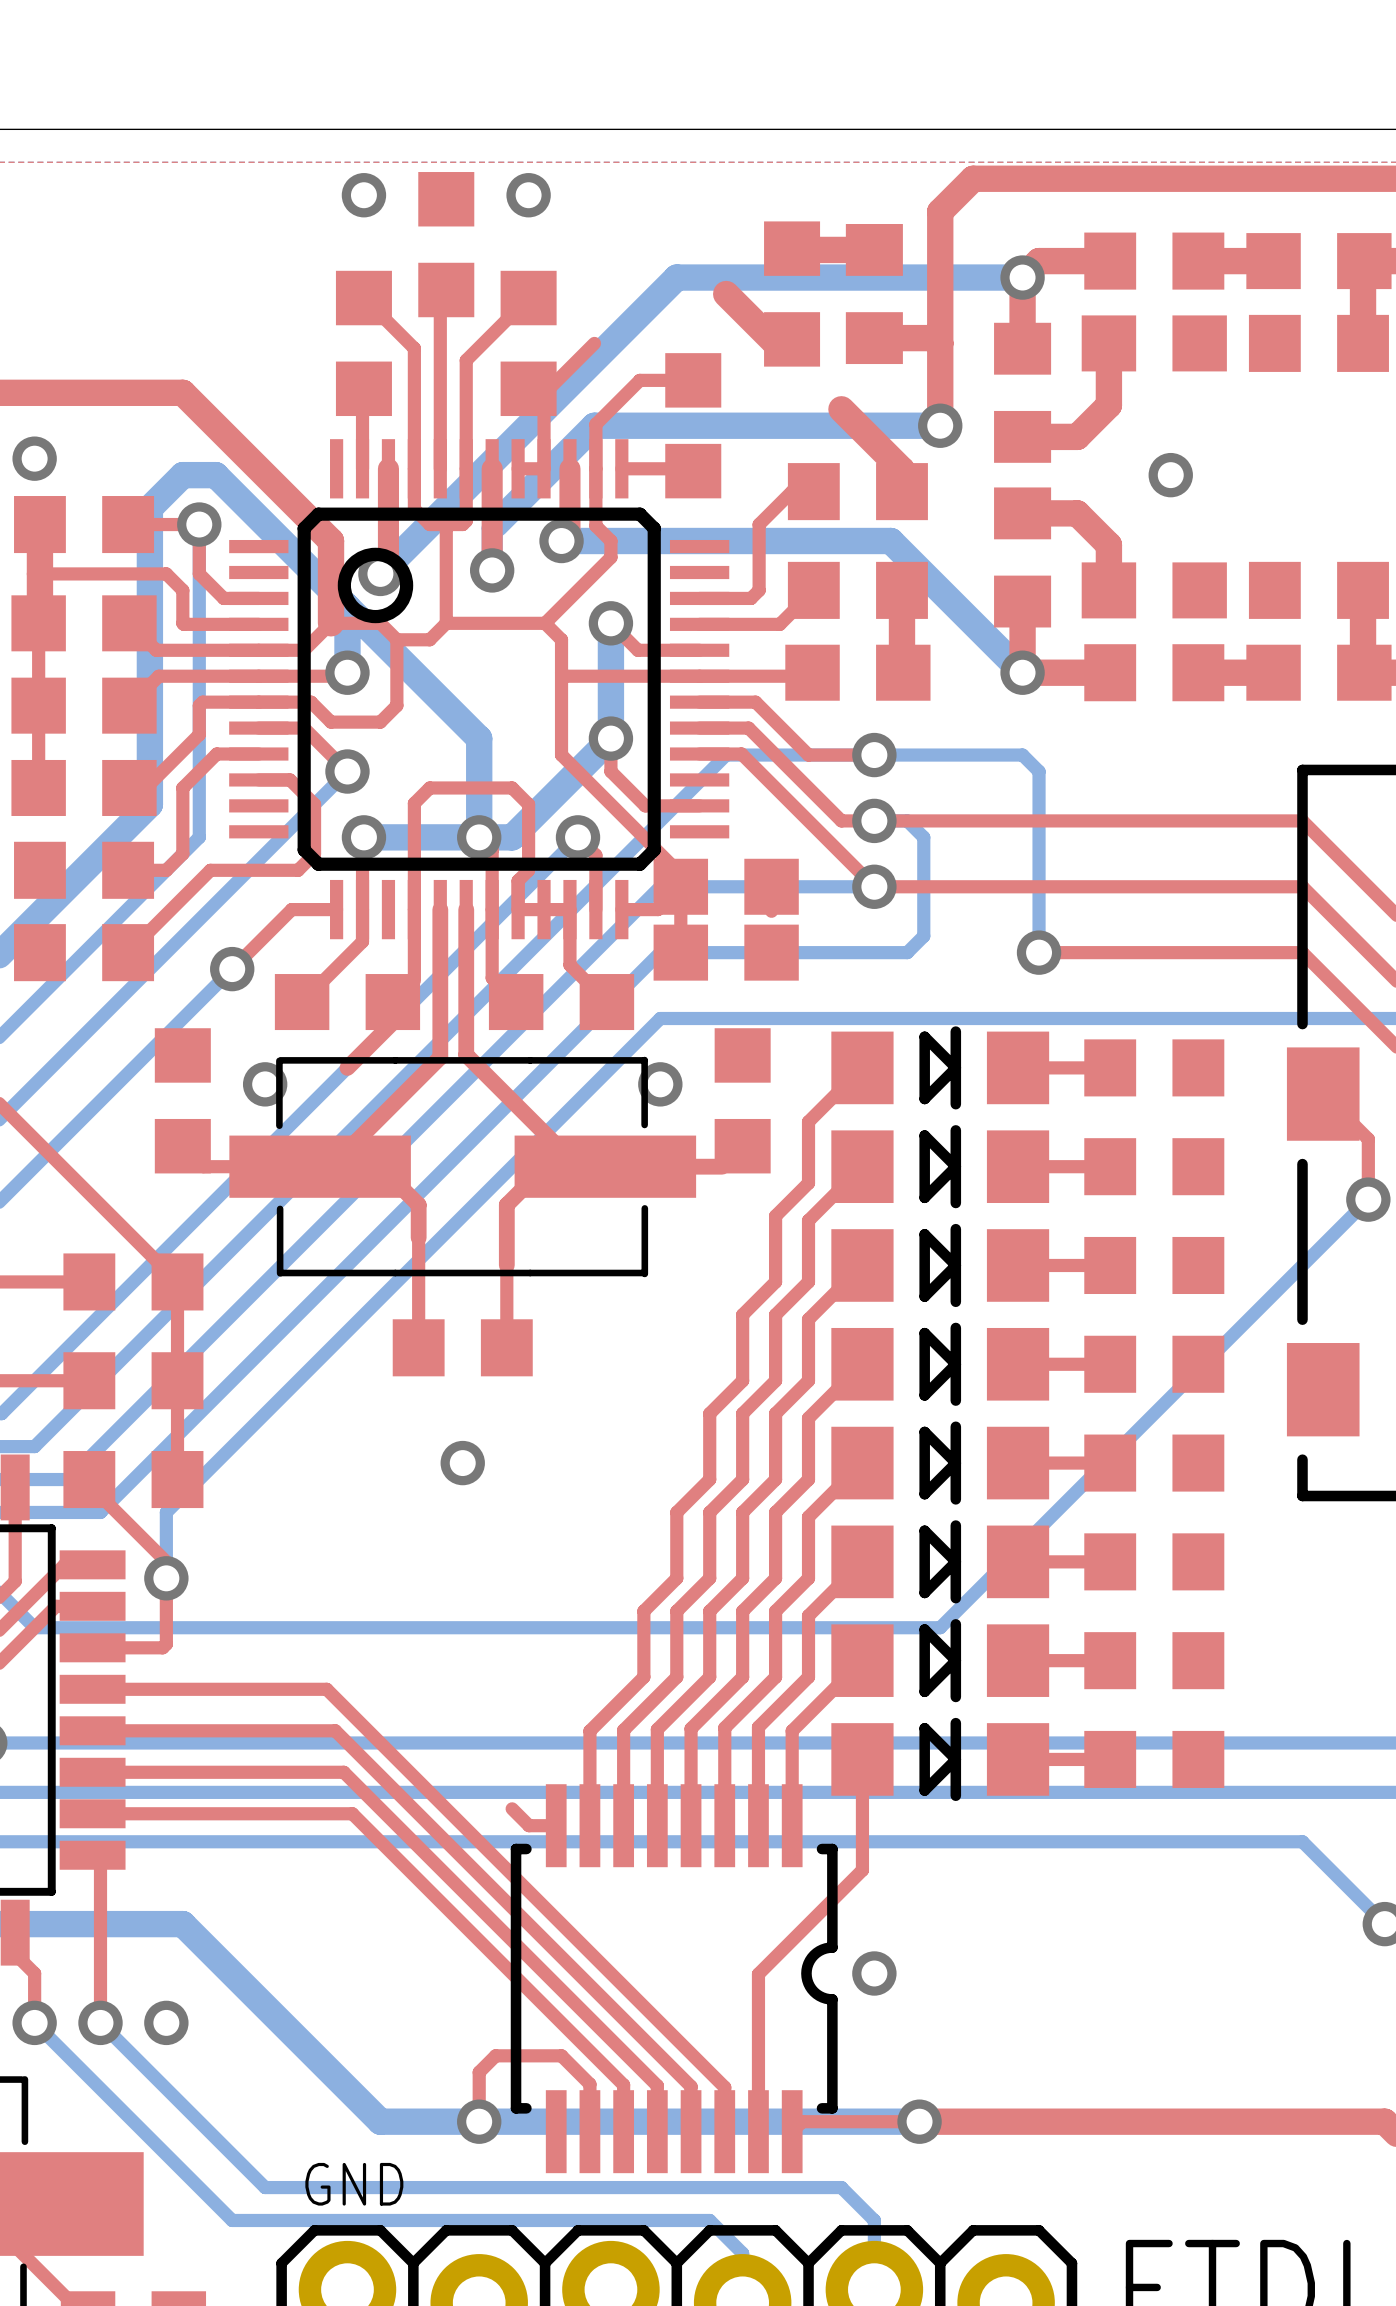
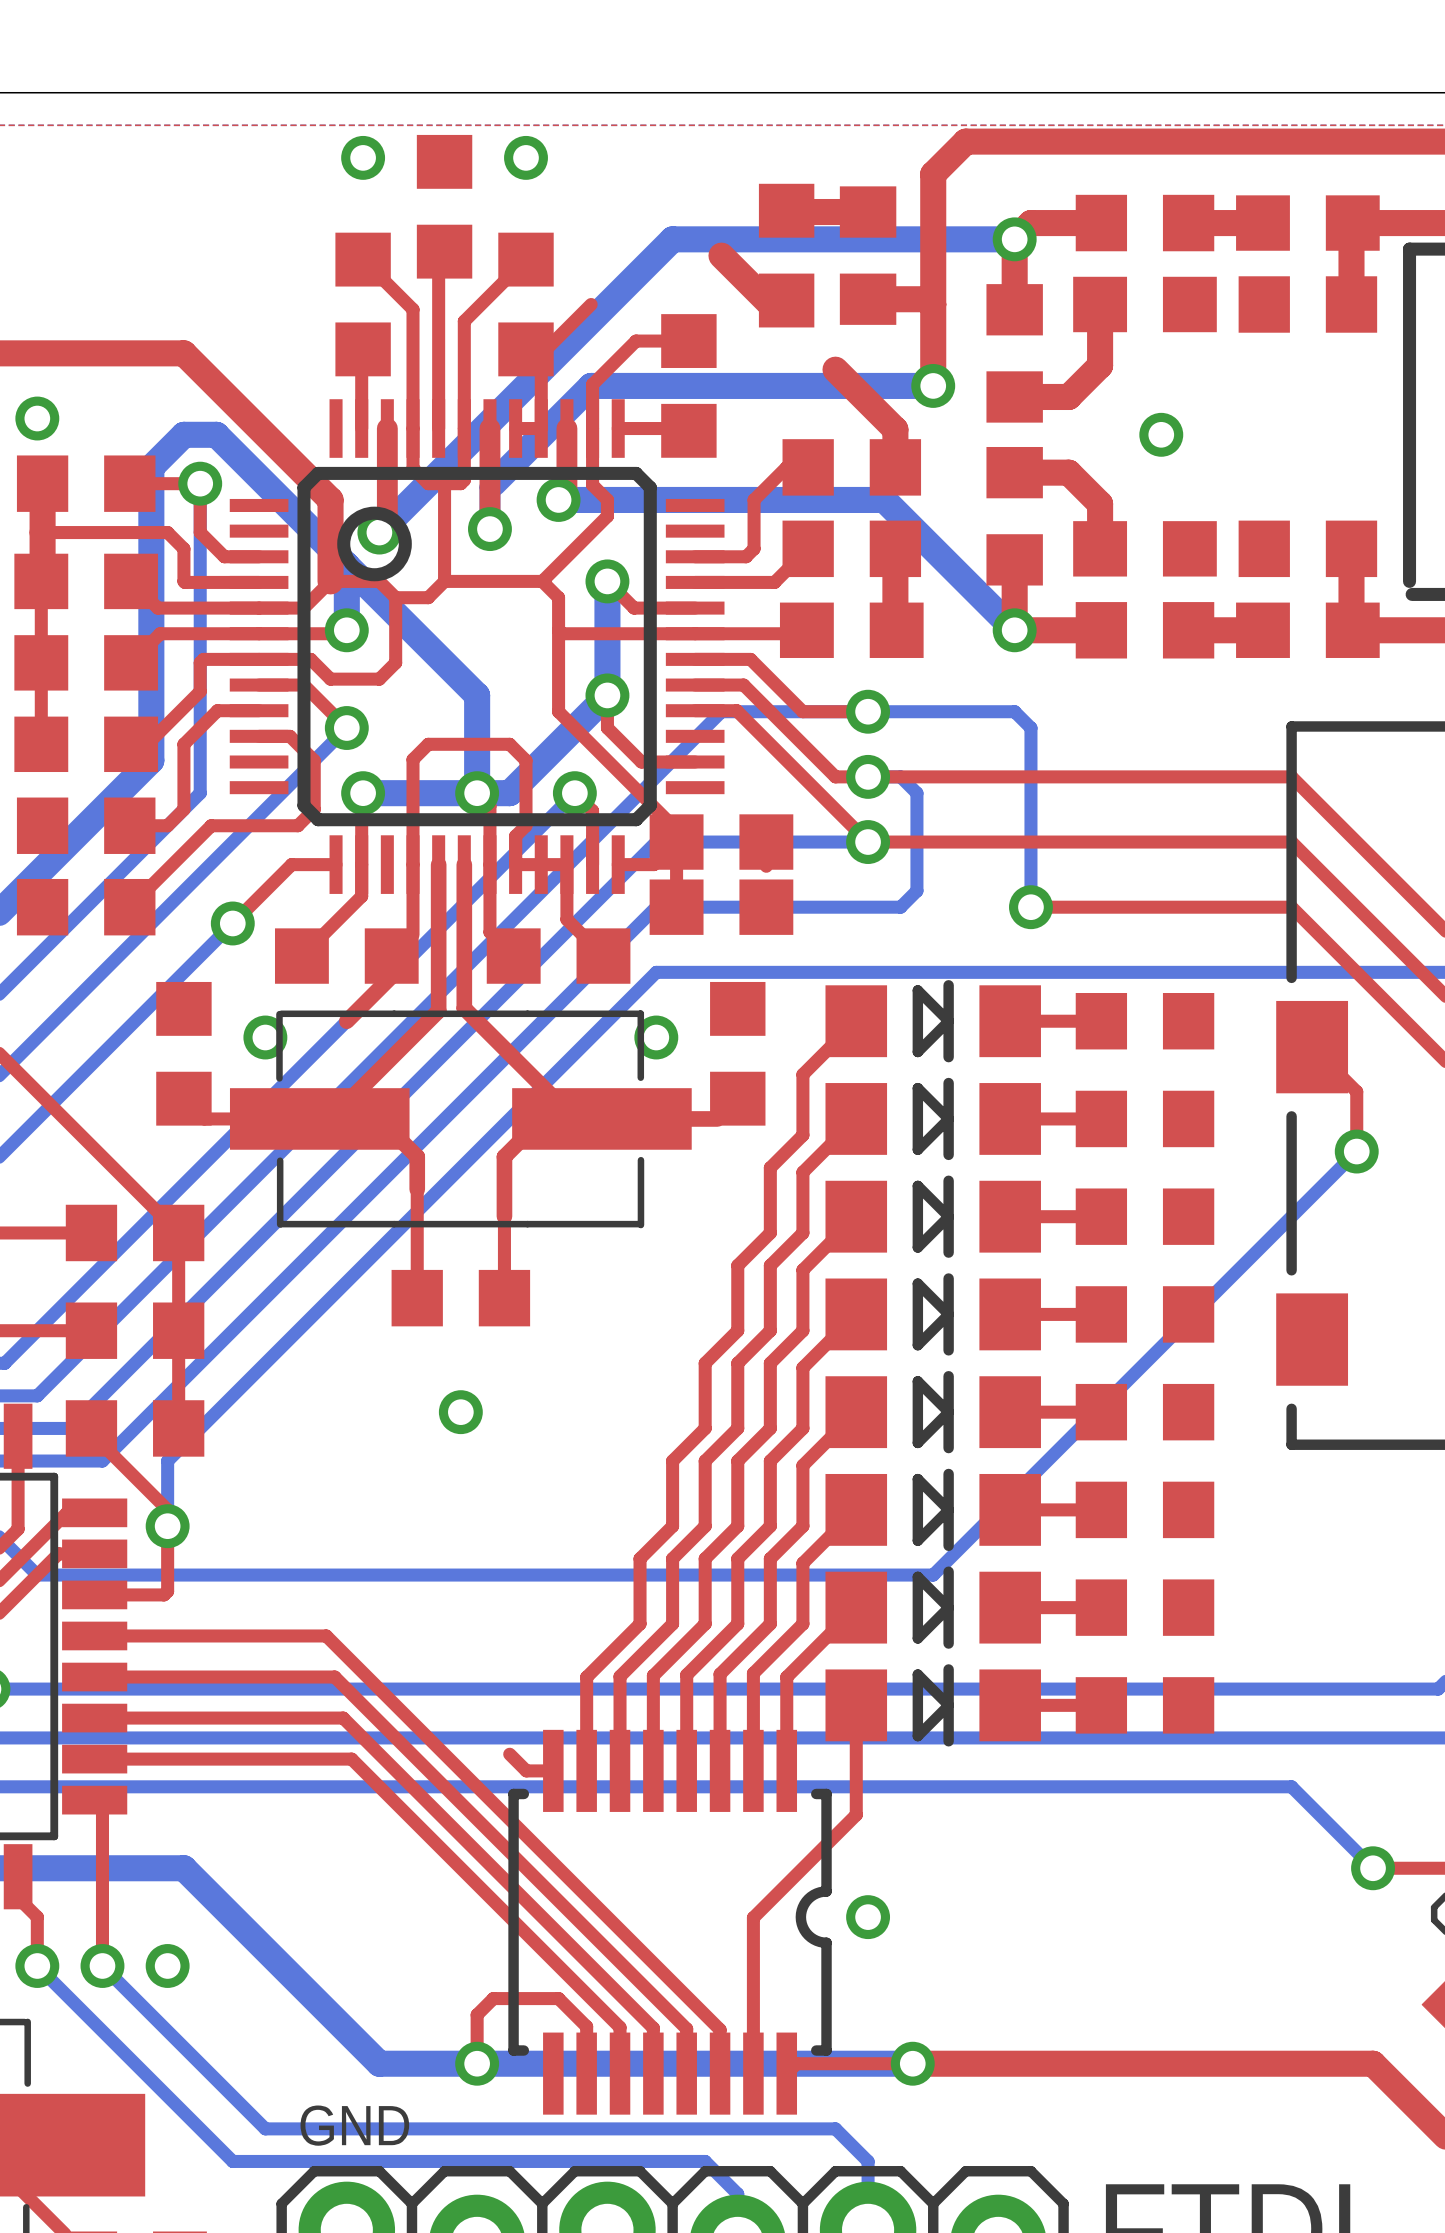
top track: (813, 491) (792, 491) (759, 524) (759, 541) -> (808, 467) (786, 467) (754, 499)
part position: (857, 491) -> (851, 467)

